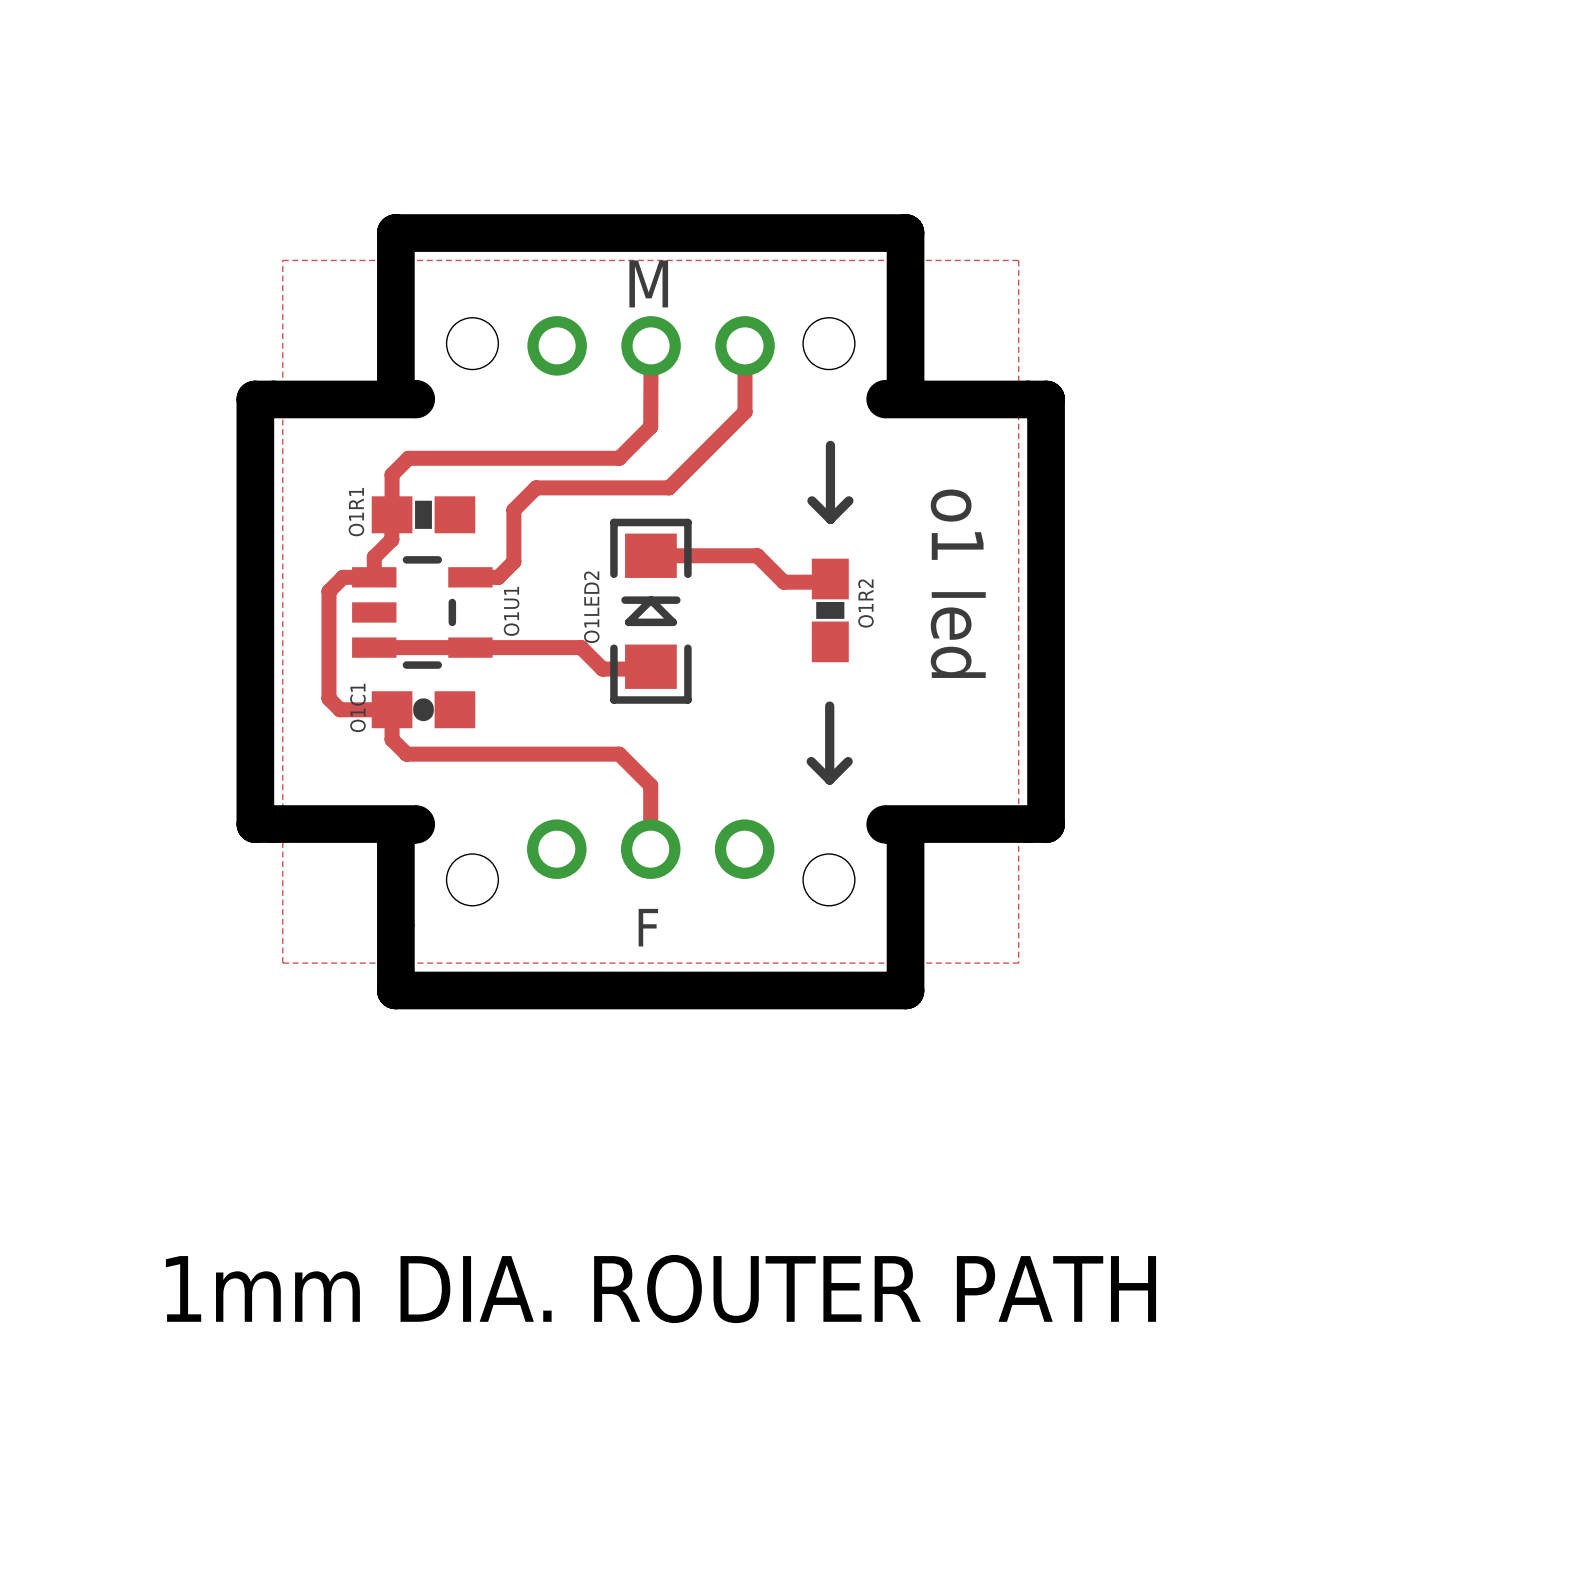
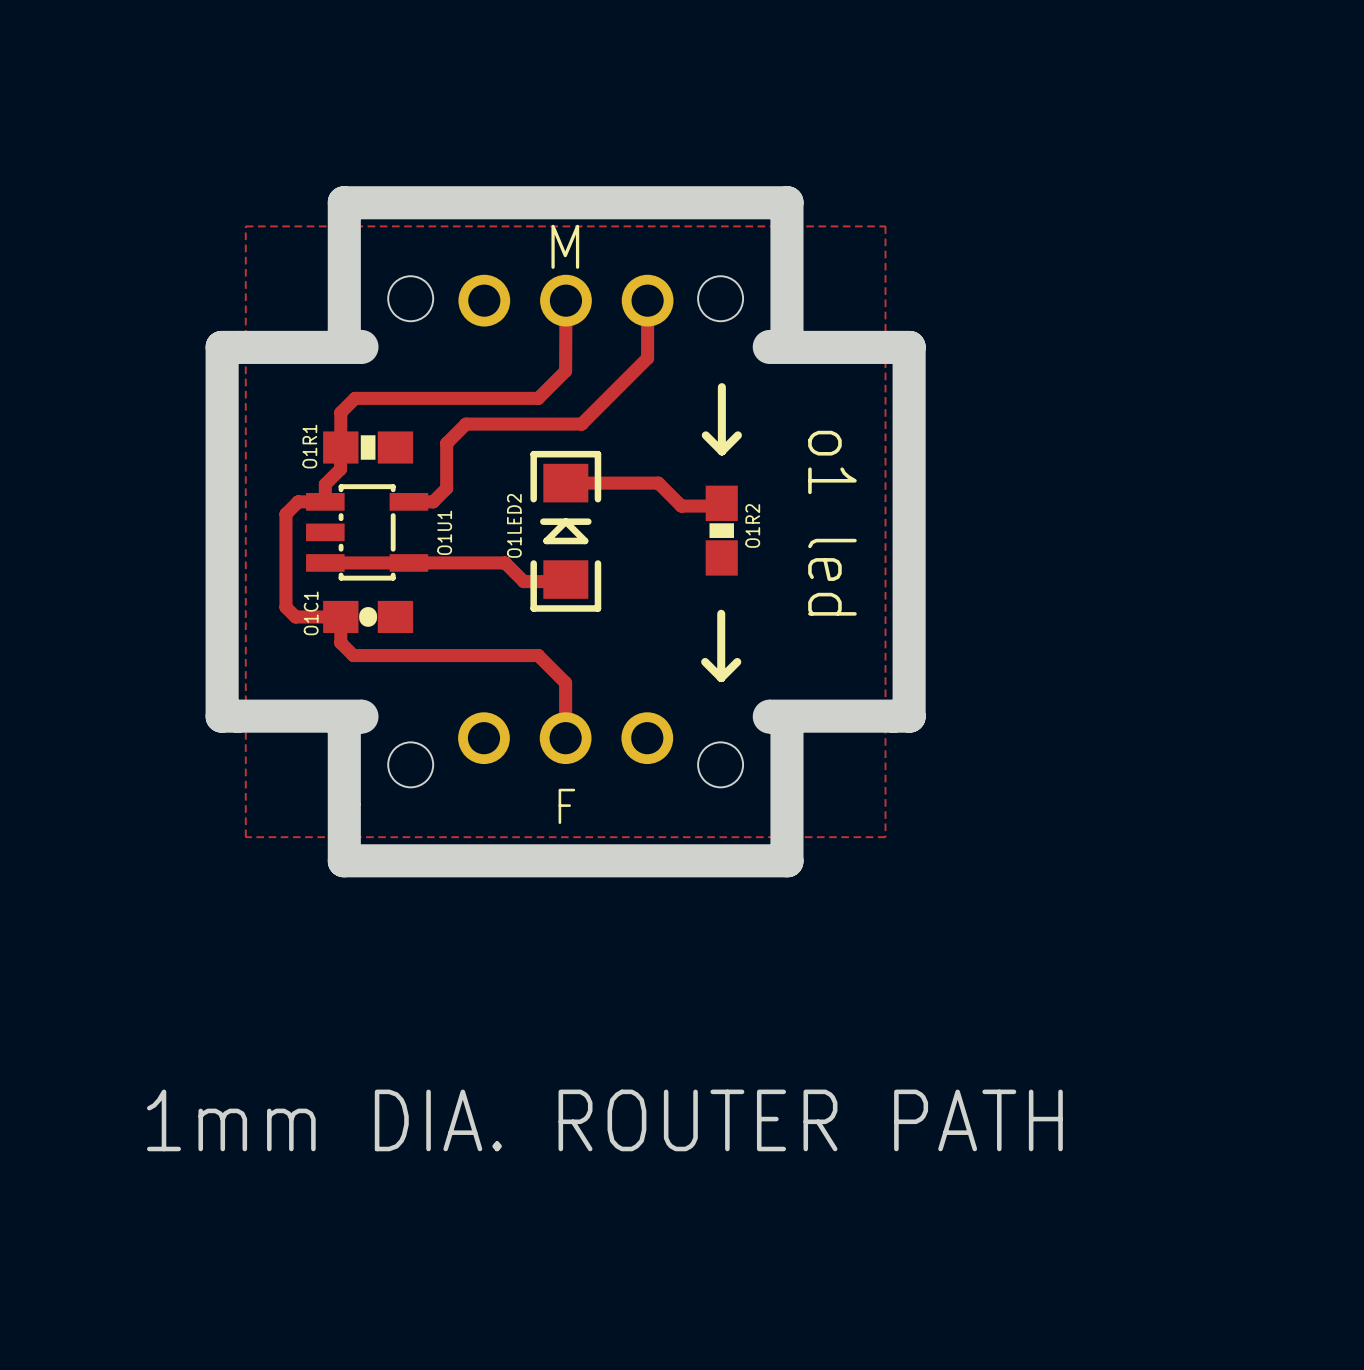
O1U1 footprint: [352, 556, 493, 669] -> [306, 484, 429, 581]

